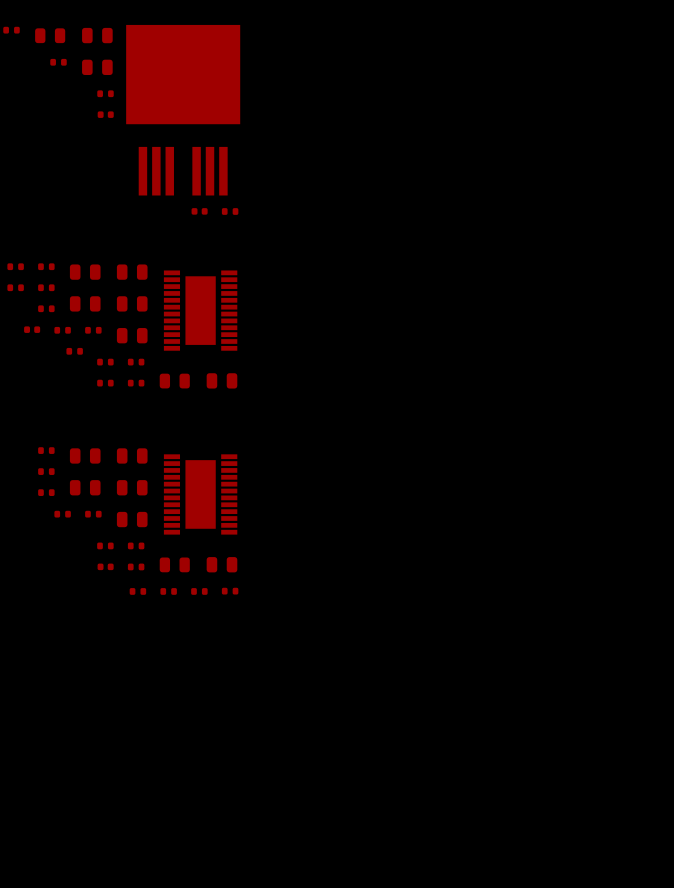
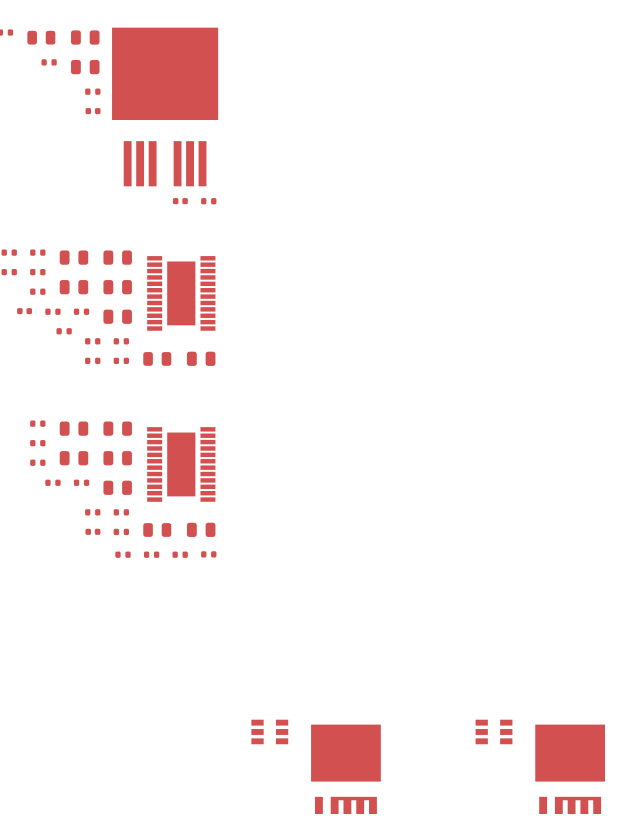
part: none -> (269, 731)
part: none -> (493, 731)
part: none -> (345, 769)
part: none -> (570, 769)

